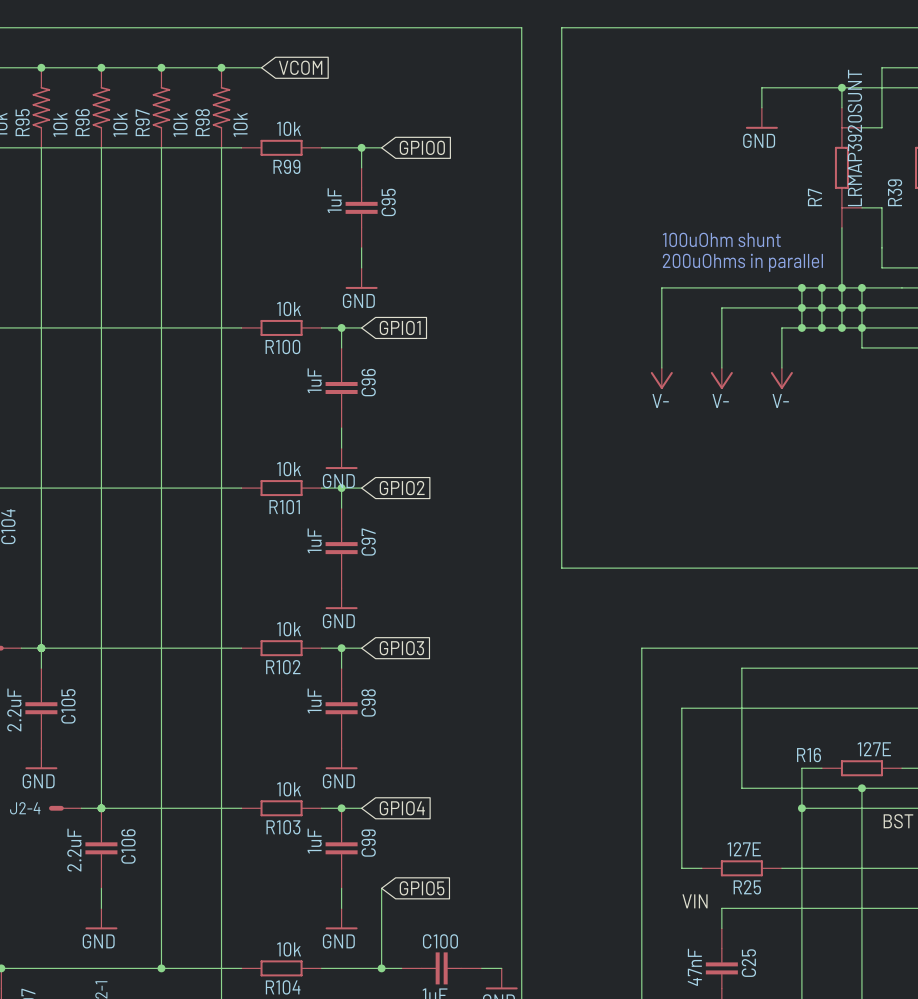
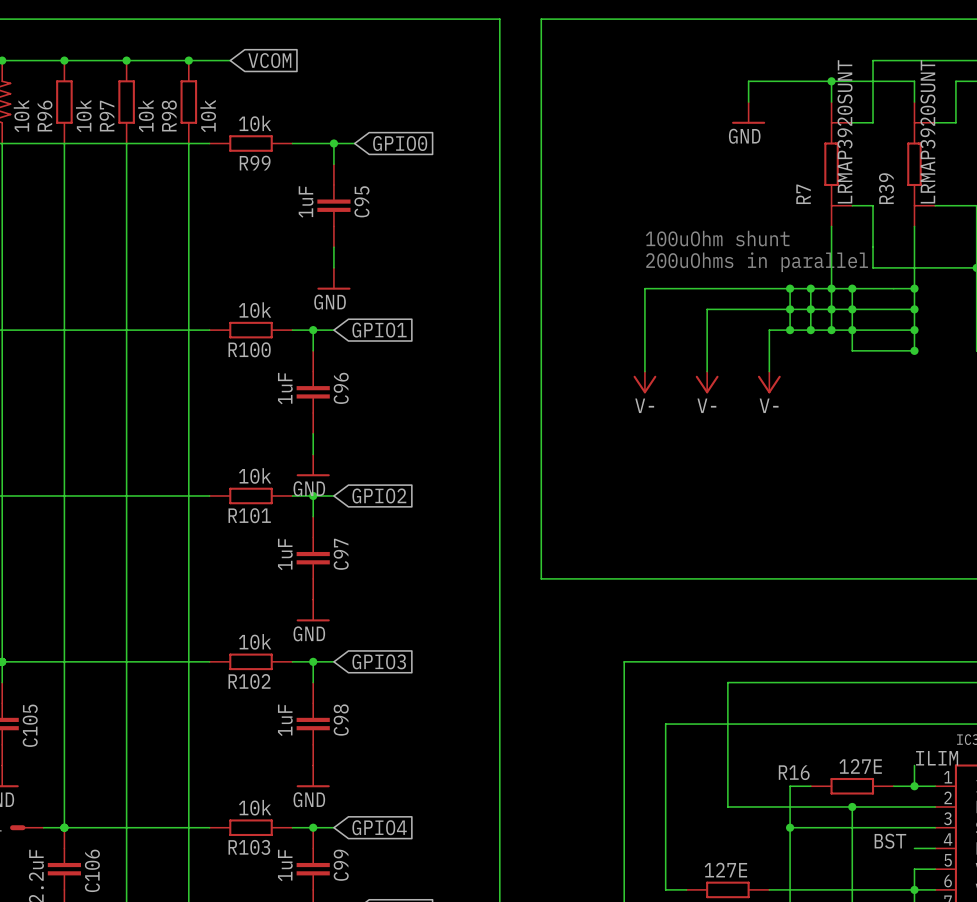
R96 symbol: [92, 67, 111, 148] -> [56, 60, 73, 144]
R97 symbol: [152, 67, 171, 148] -> [118, 60, 135, 144]
R98 symbol: [212, 67, 231, 148] -> [180, 60, 198, 144]

